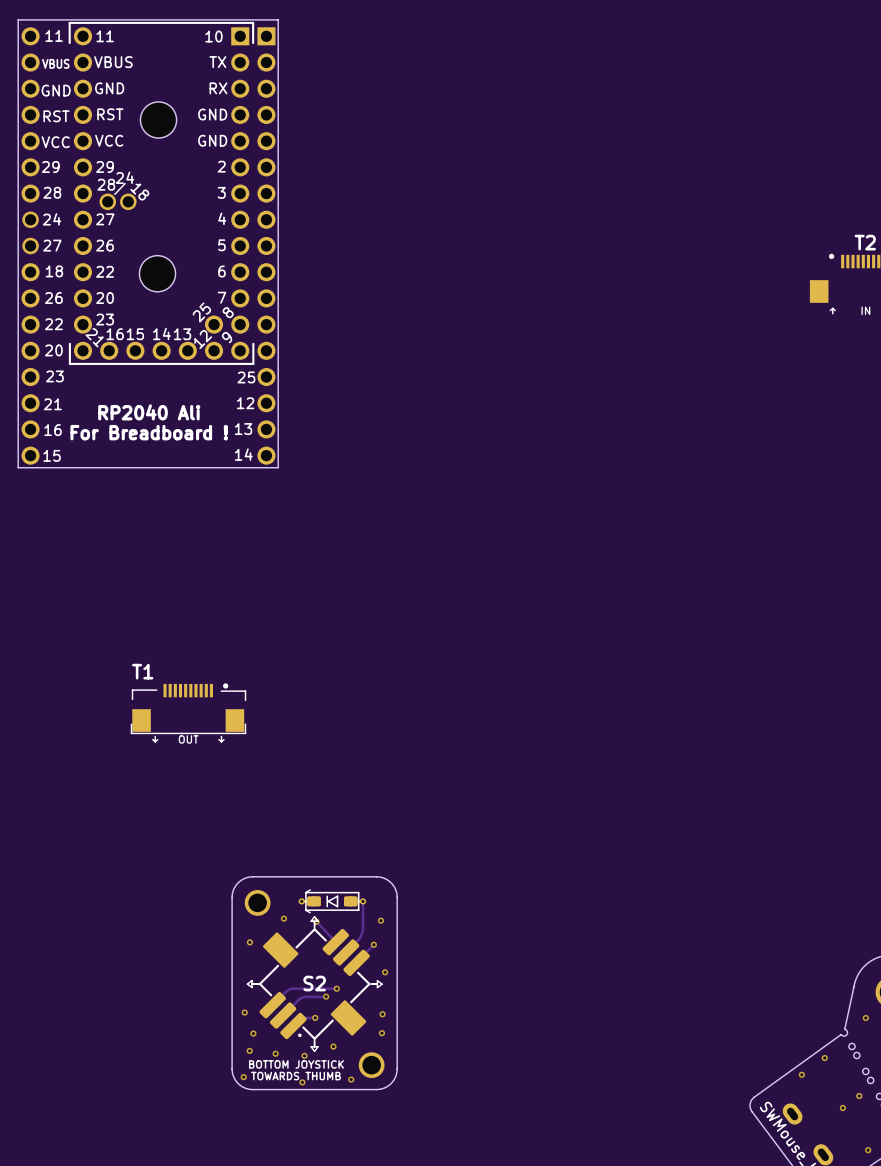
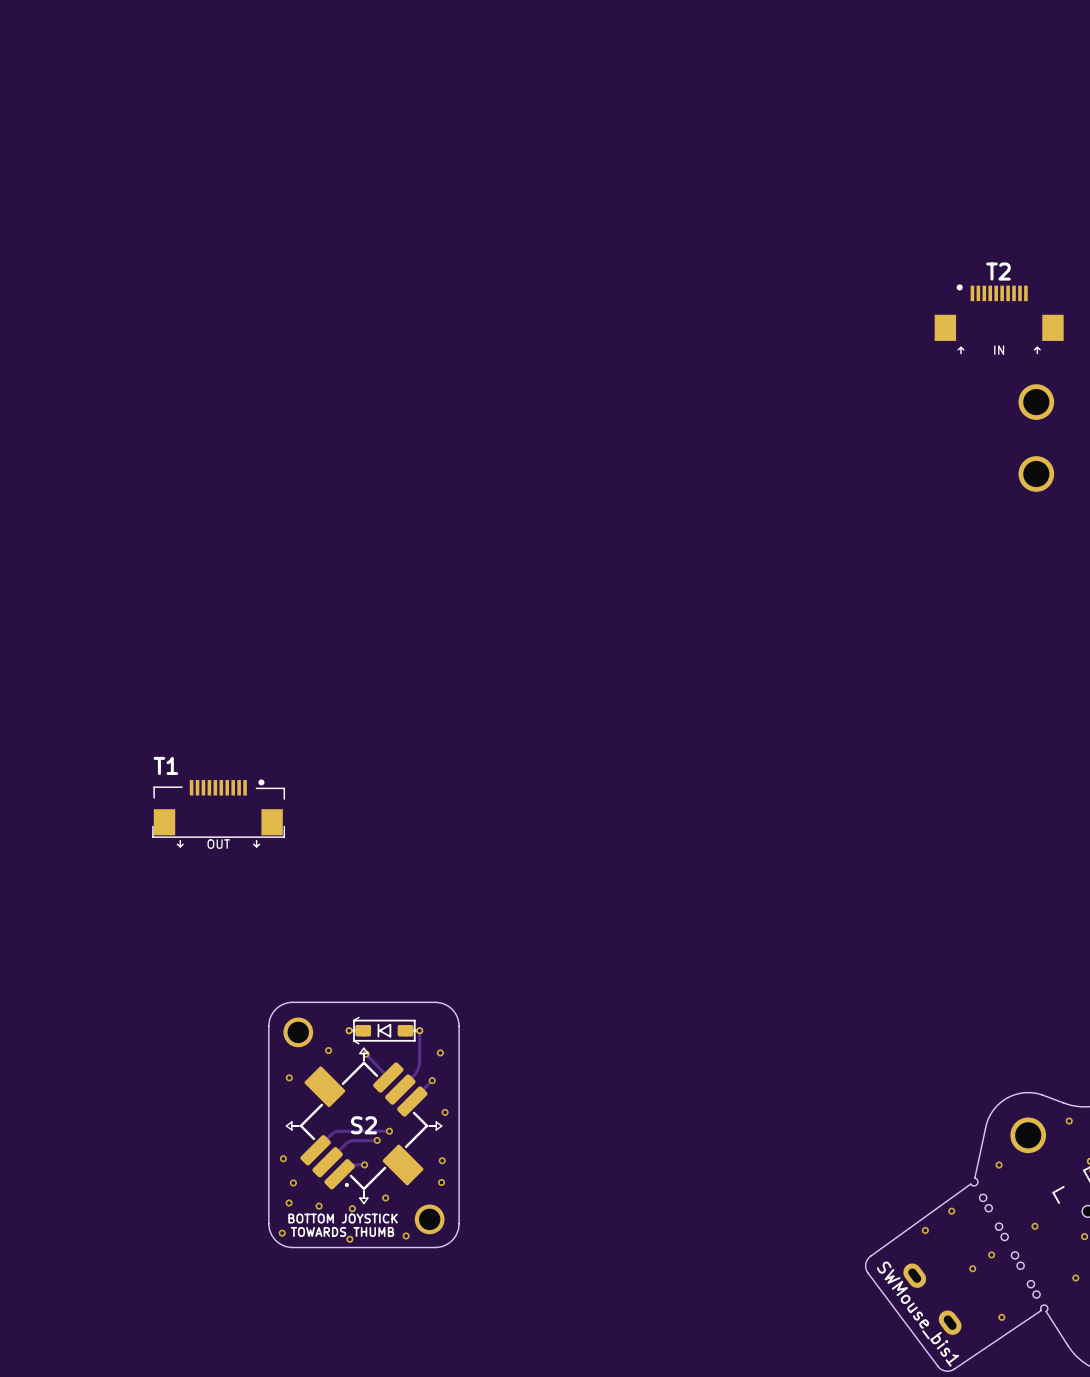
board edge: (278, 19) (18, 19) (18, 467) (278, 467) (278, 19) -> none
part: (158, 120) -> none
part: (148, 243) -> none
part: (157, 273) -> none
text: RP2040 Ali (149, 412) -> none
text: For Breadboard ! (149, 432) -> none

